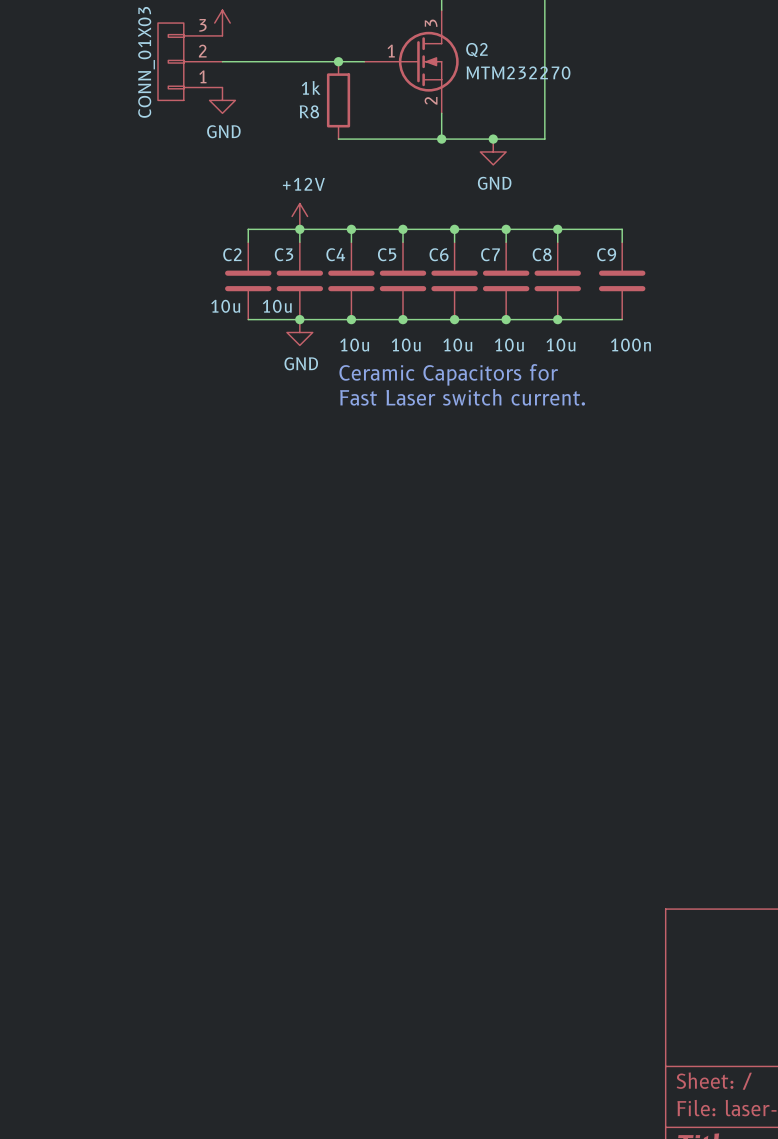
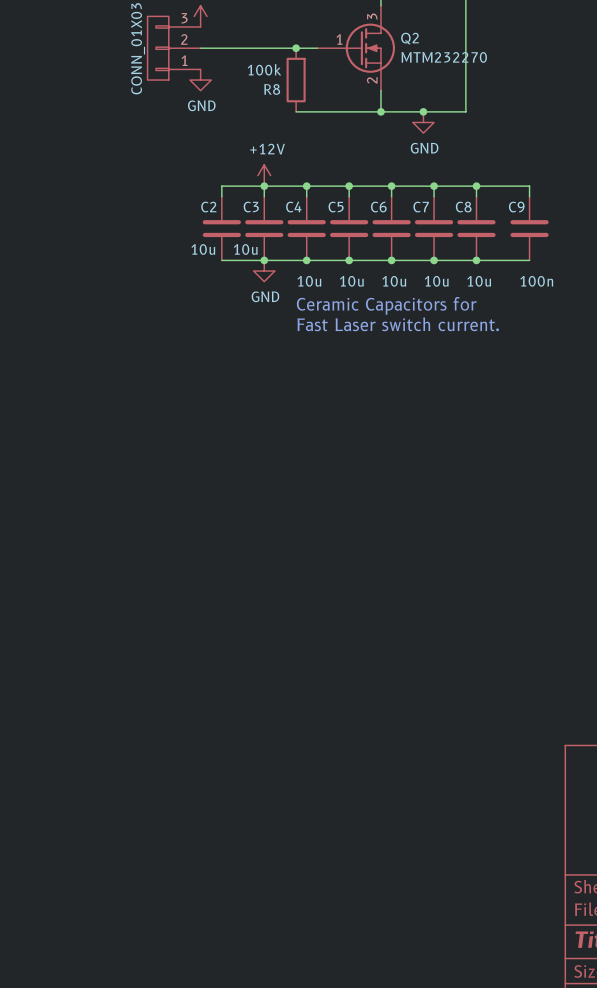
R8 value: 1k (311, 87) -> 100k (264, 69)

